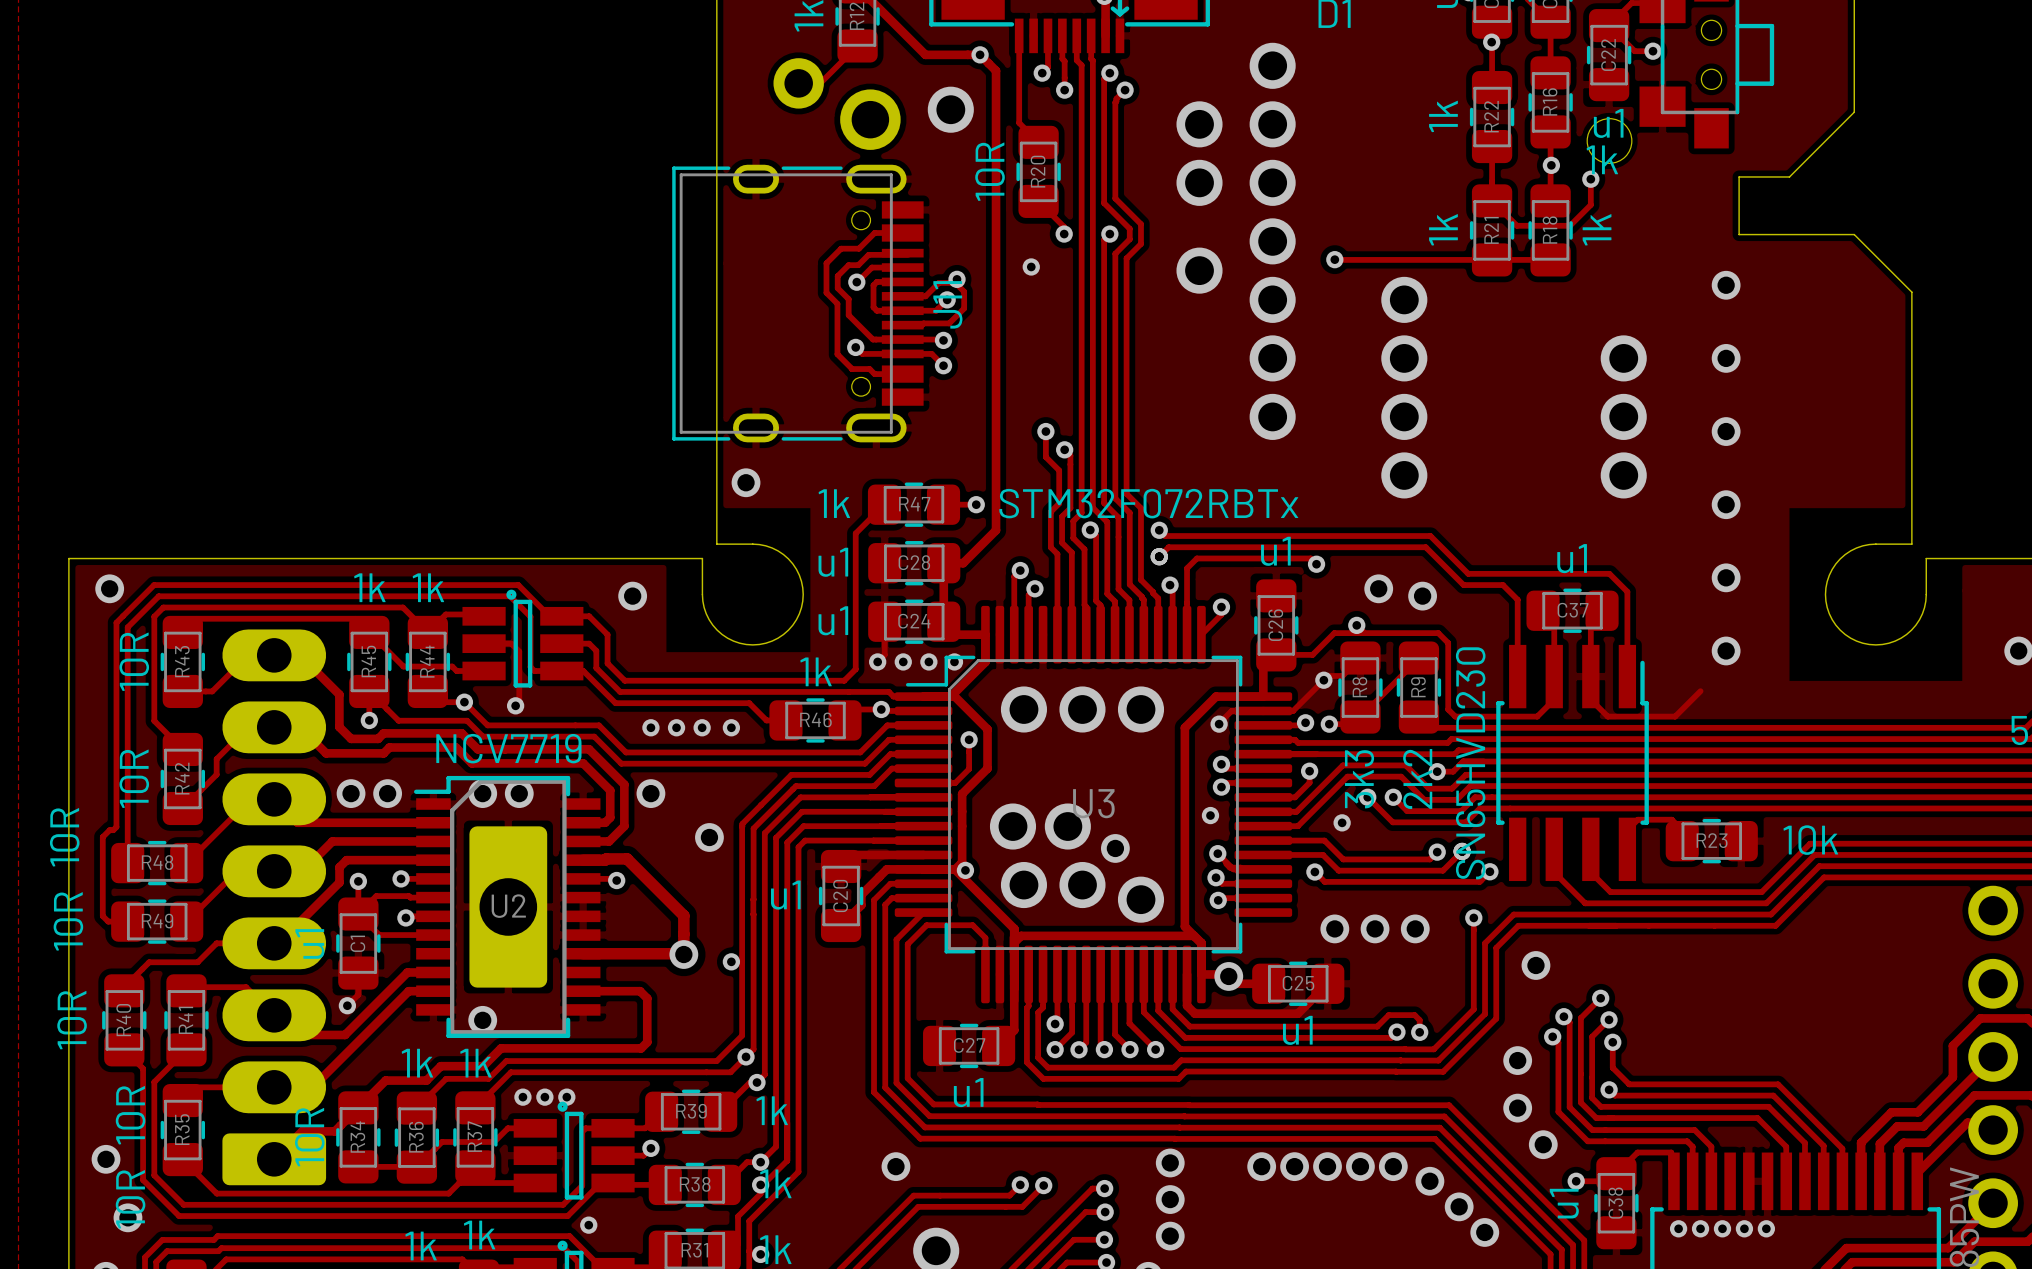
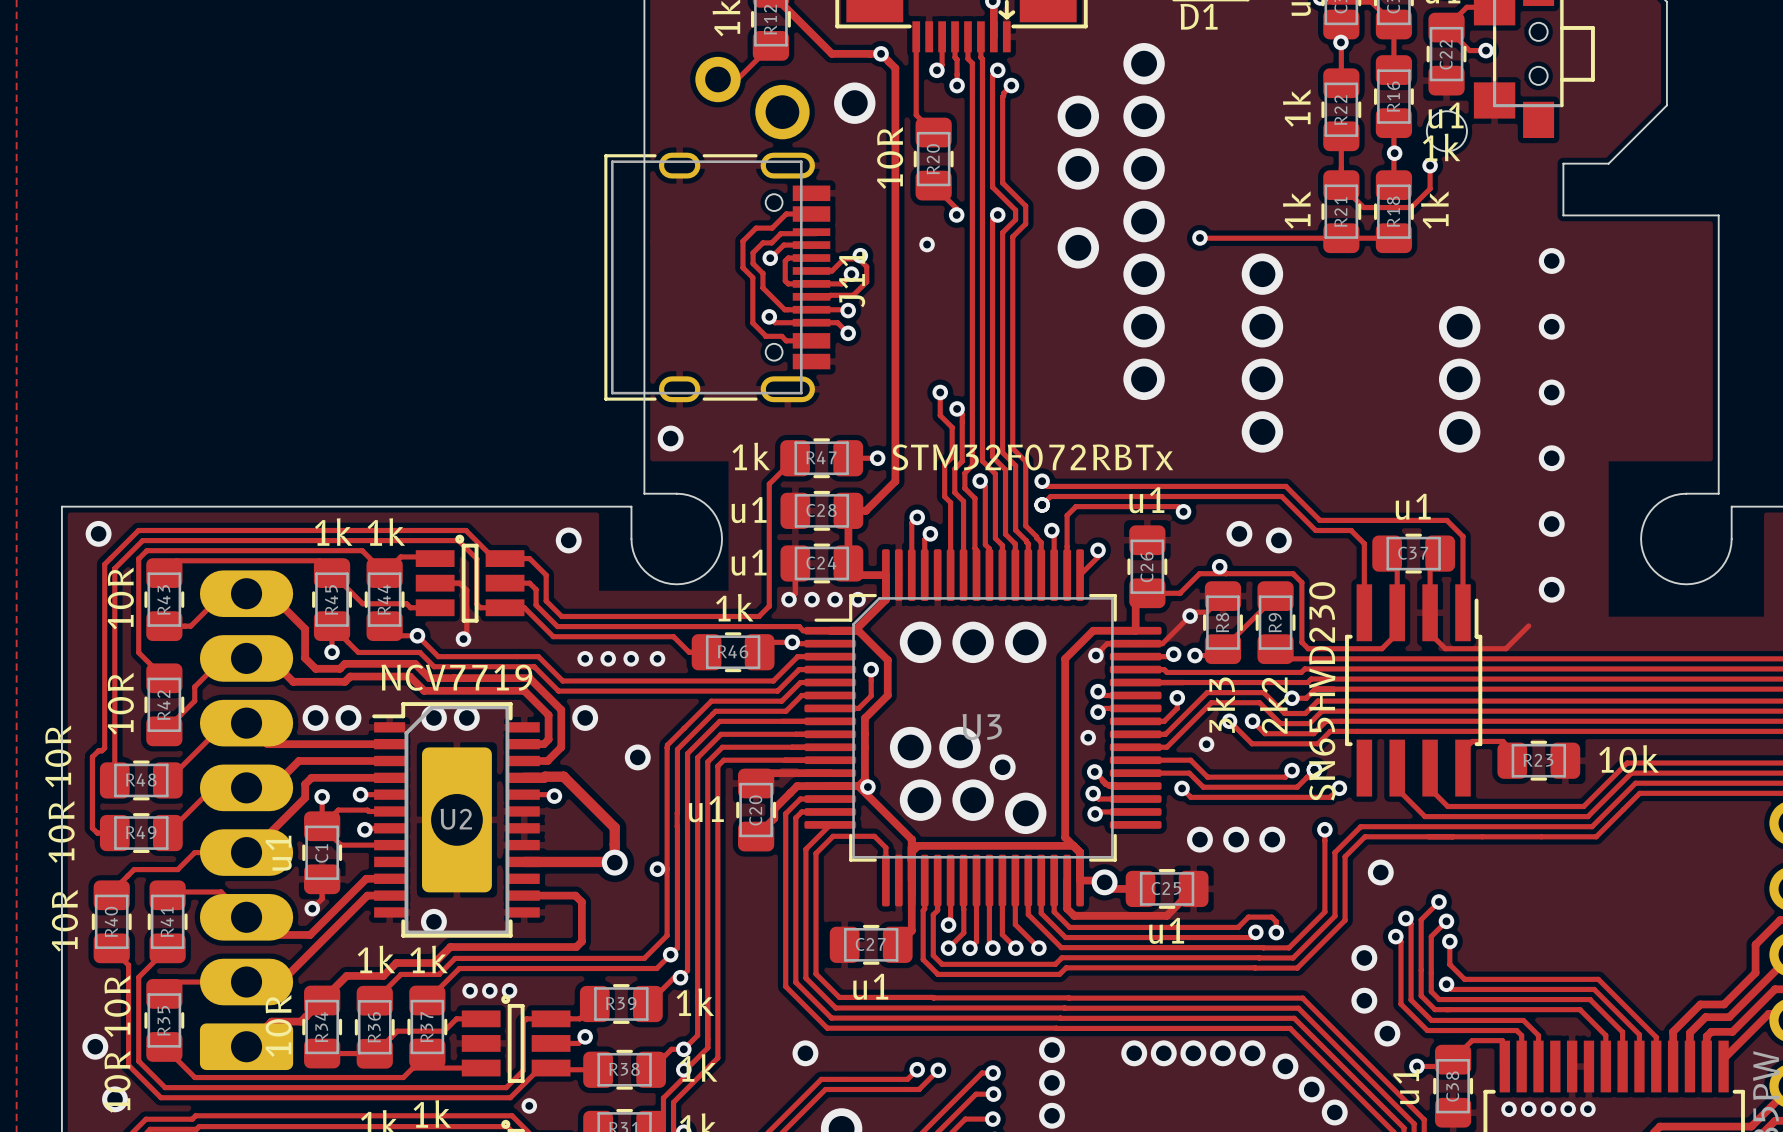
board edge: (1854, 234) (1911, 292) -> (1666, 215) (1718, 215) (1718, 267)

